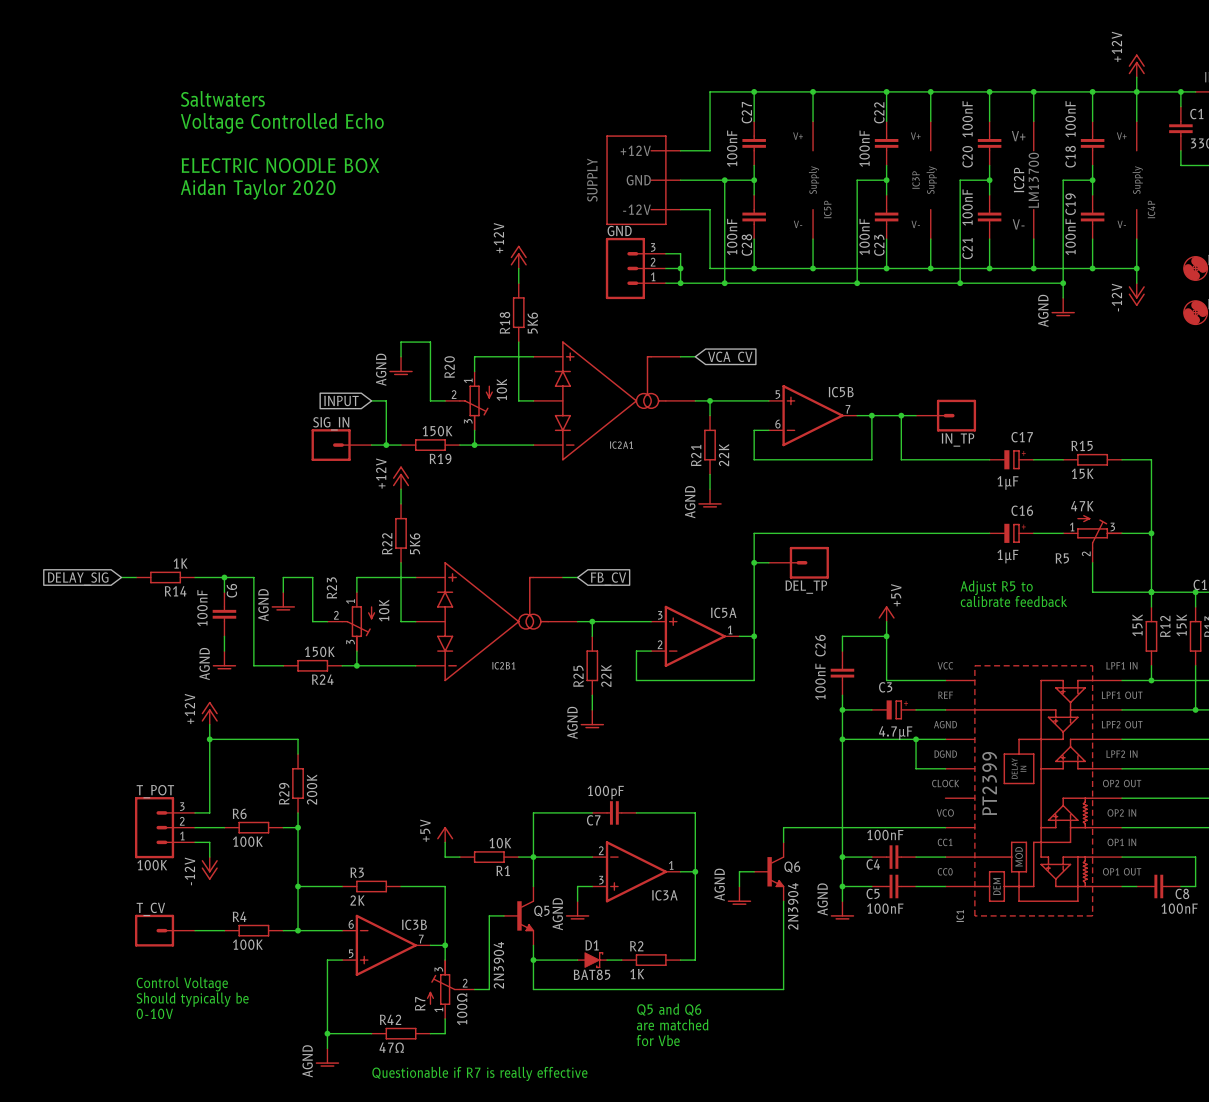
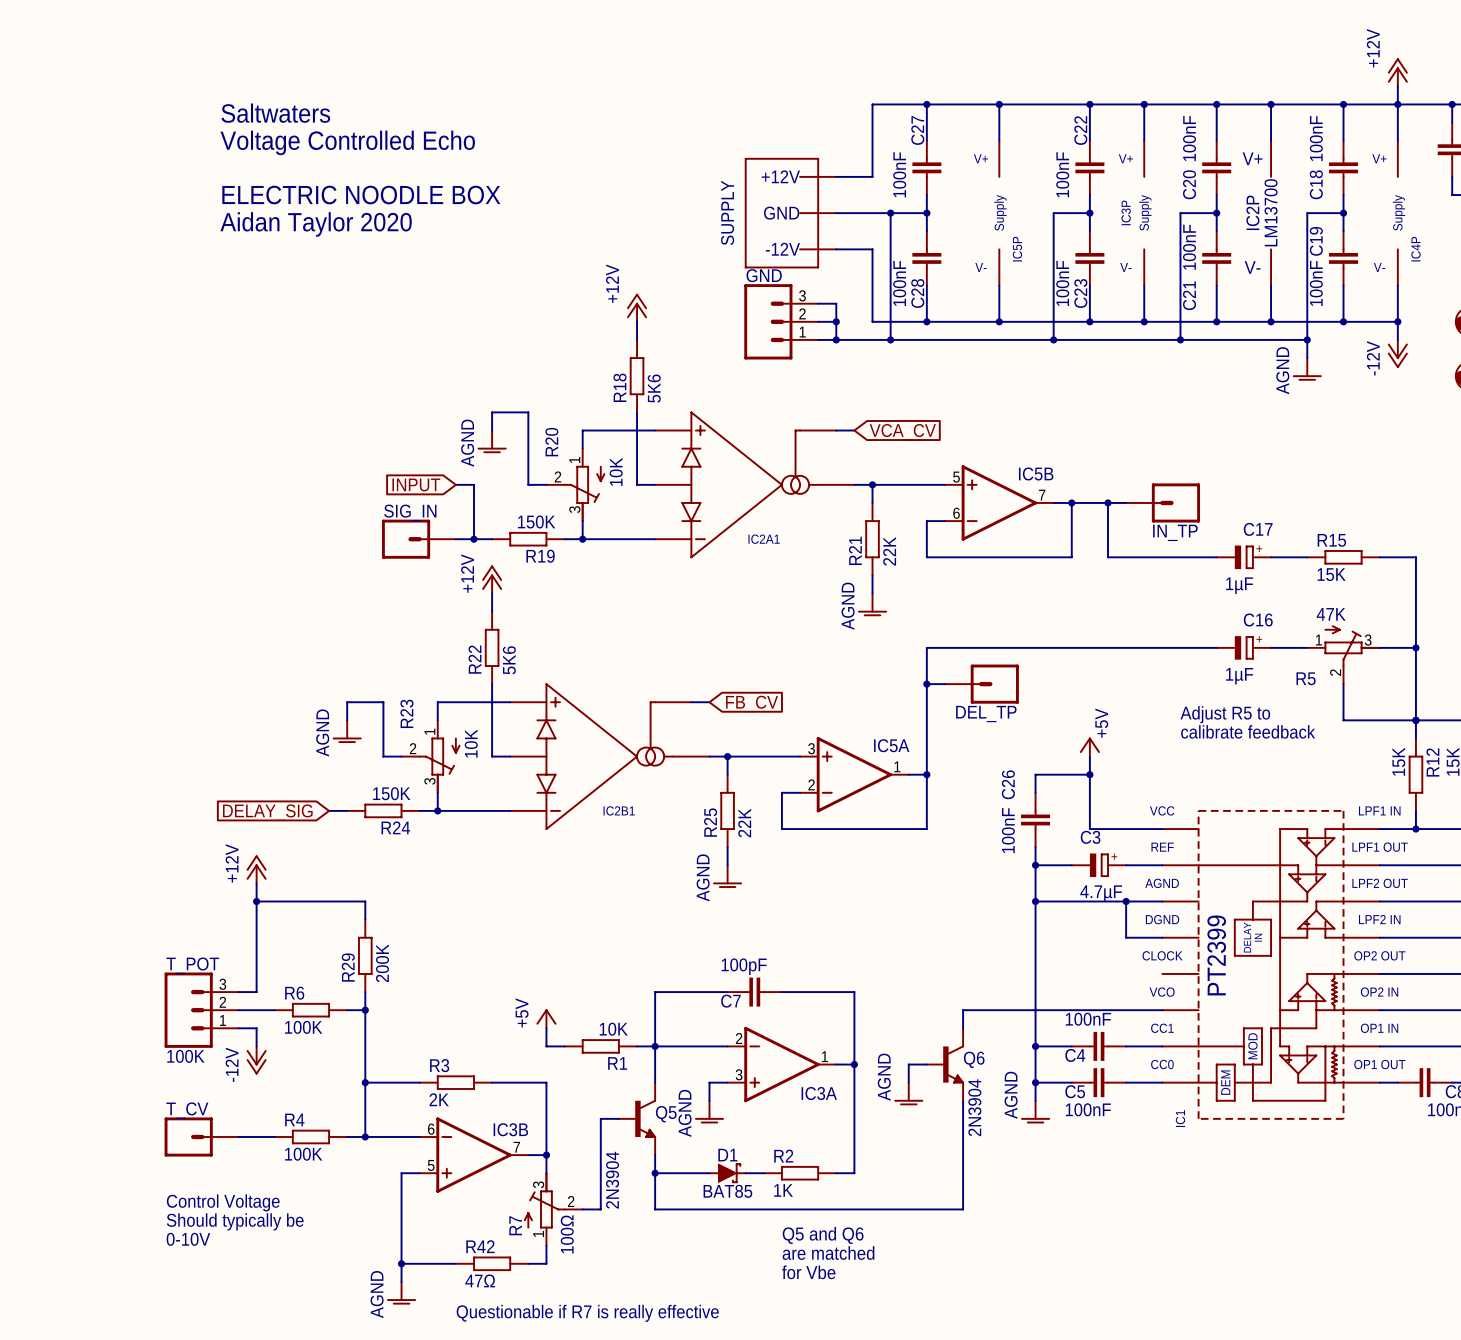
wire: (121, 577) (136, 577) -> none
R14: 1K (165, 577) -> none
wire: (195, 577) (253, 577) (253, 665) (268, 665) -> none
wire: (224, 577) (224, 592) -> none
junction: (224, 577) -> none
global label: DELAY_SIG (78, 579) -> none
C6: 100nF (224, 614) -> none
wire: (224, 636) (224, 651) -> none
power symbol: AGND (224, 660) -> none
global label: none -> DELAY_SIG (267, 812)

